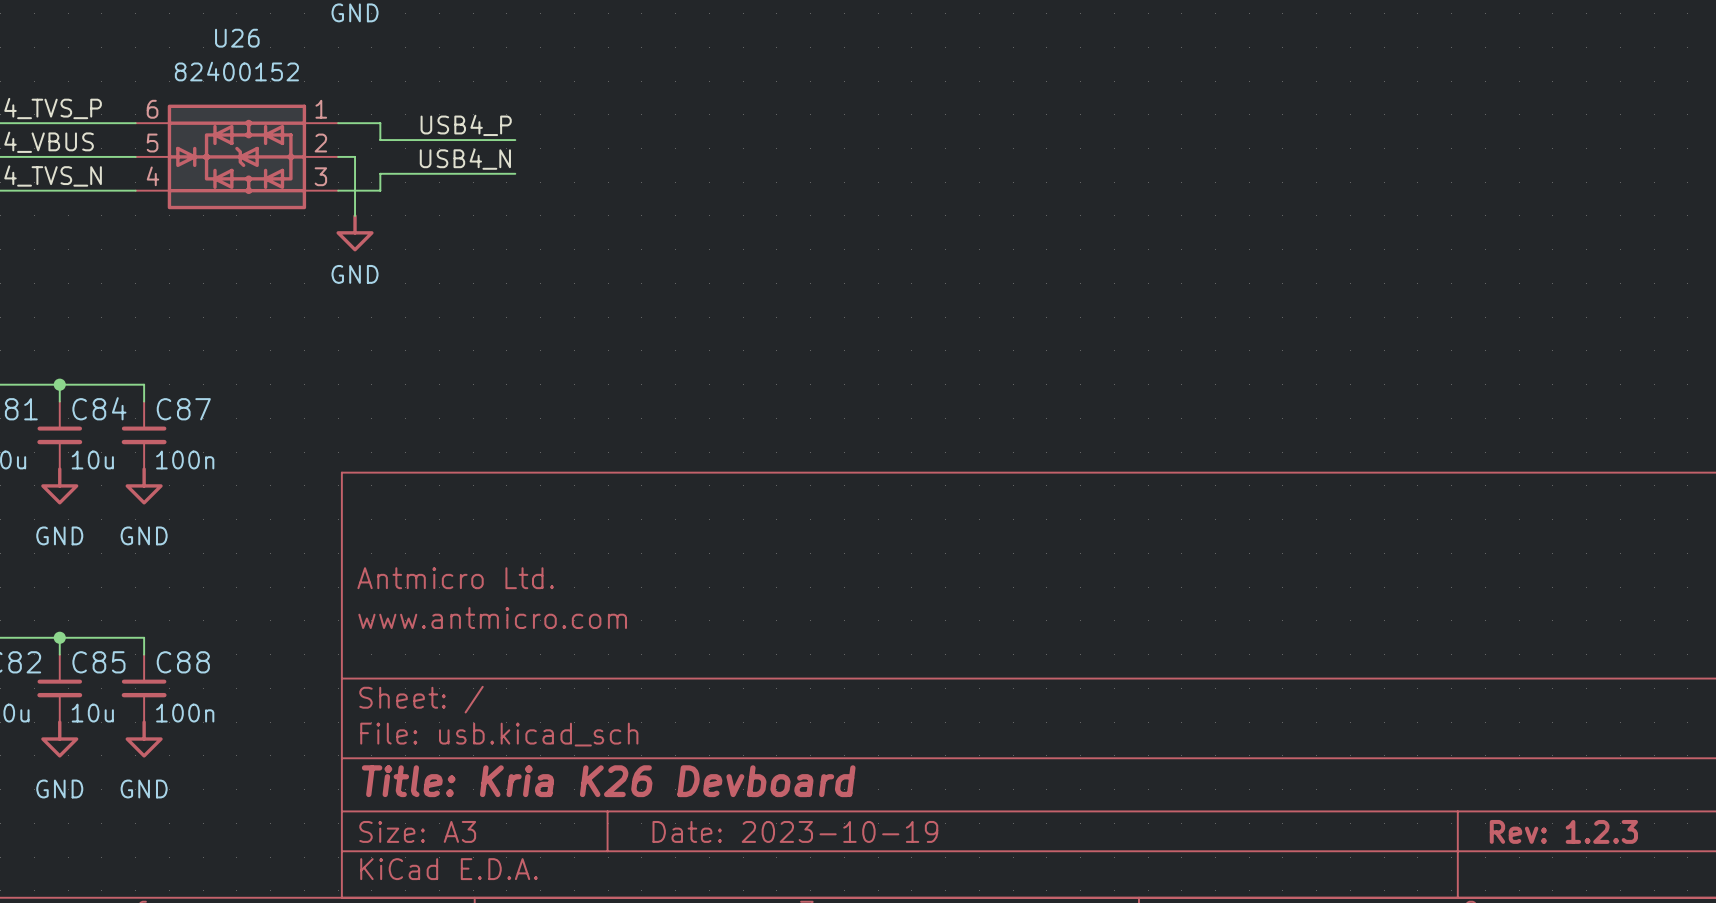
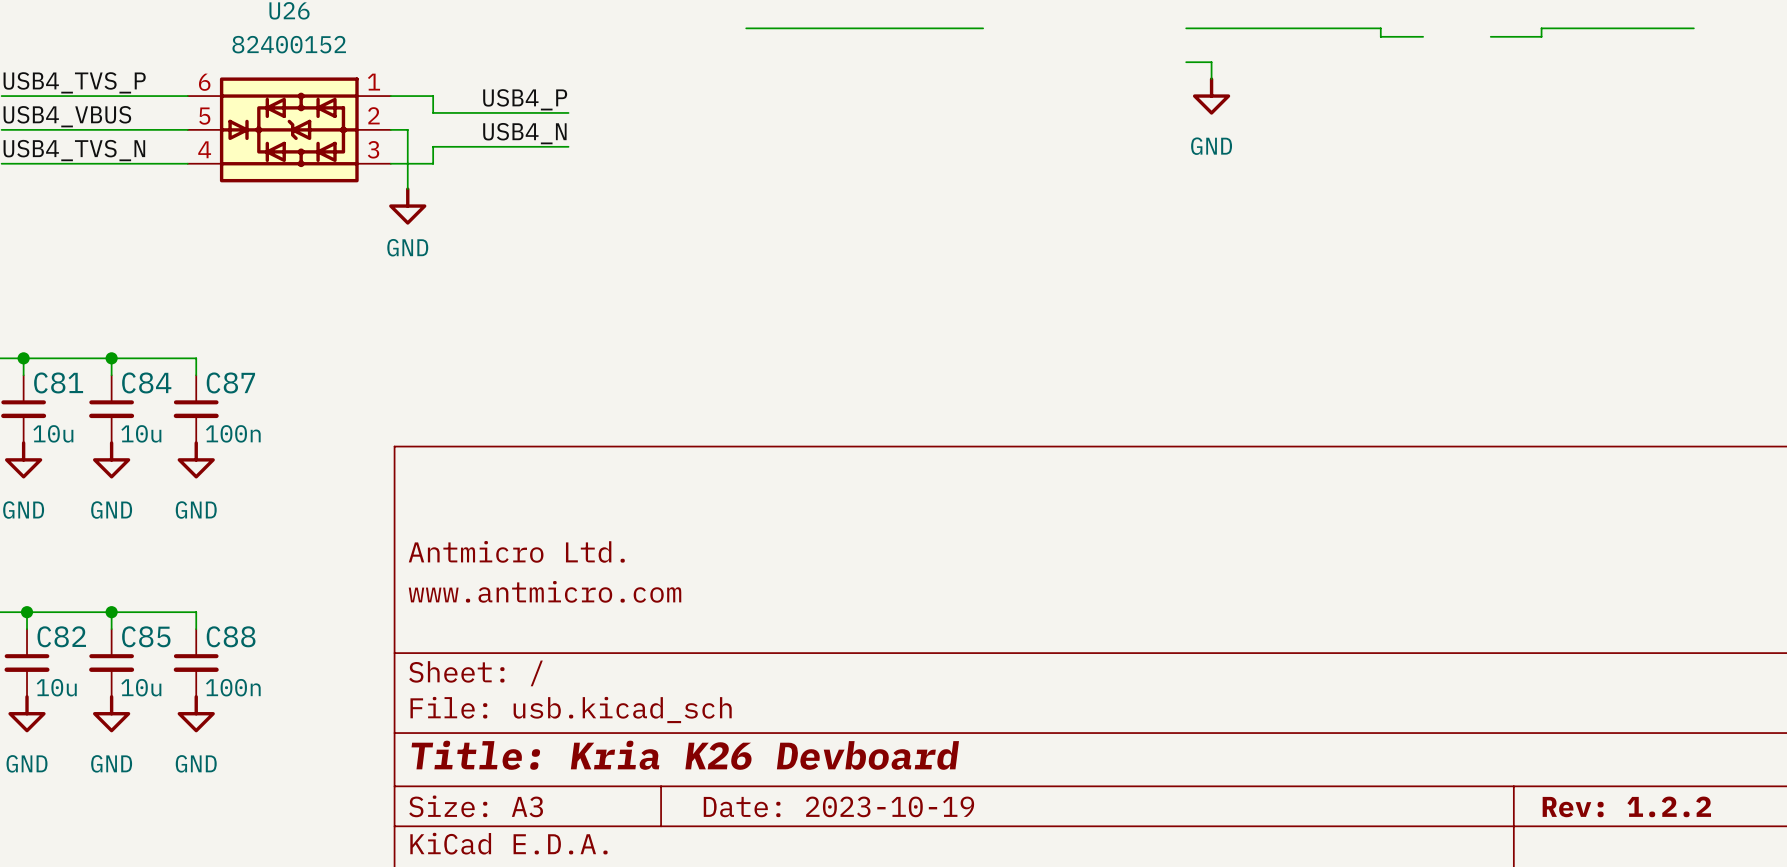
wire: none -> (746, 28) (983, 28)
wire: none -> (1186, 28) (1380, 28) (1380, 36) (1423, 36)
wire: none -> (1693, 28) (1541, 28) (1541, 36) (1490, 36)
wire: none -> (1186, 62) (1211, 62) (1211, 79)
power symbol: none -> GND (1211, 96)
title block: Rev: 1.2.3 (1563, 831) -> Rev: 1.2.2 (1626, 806)

